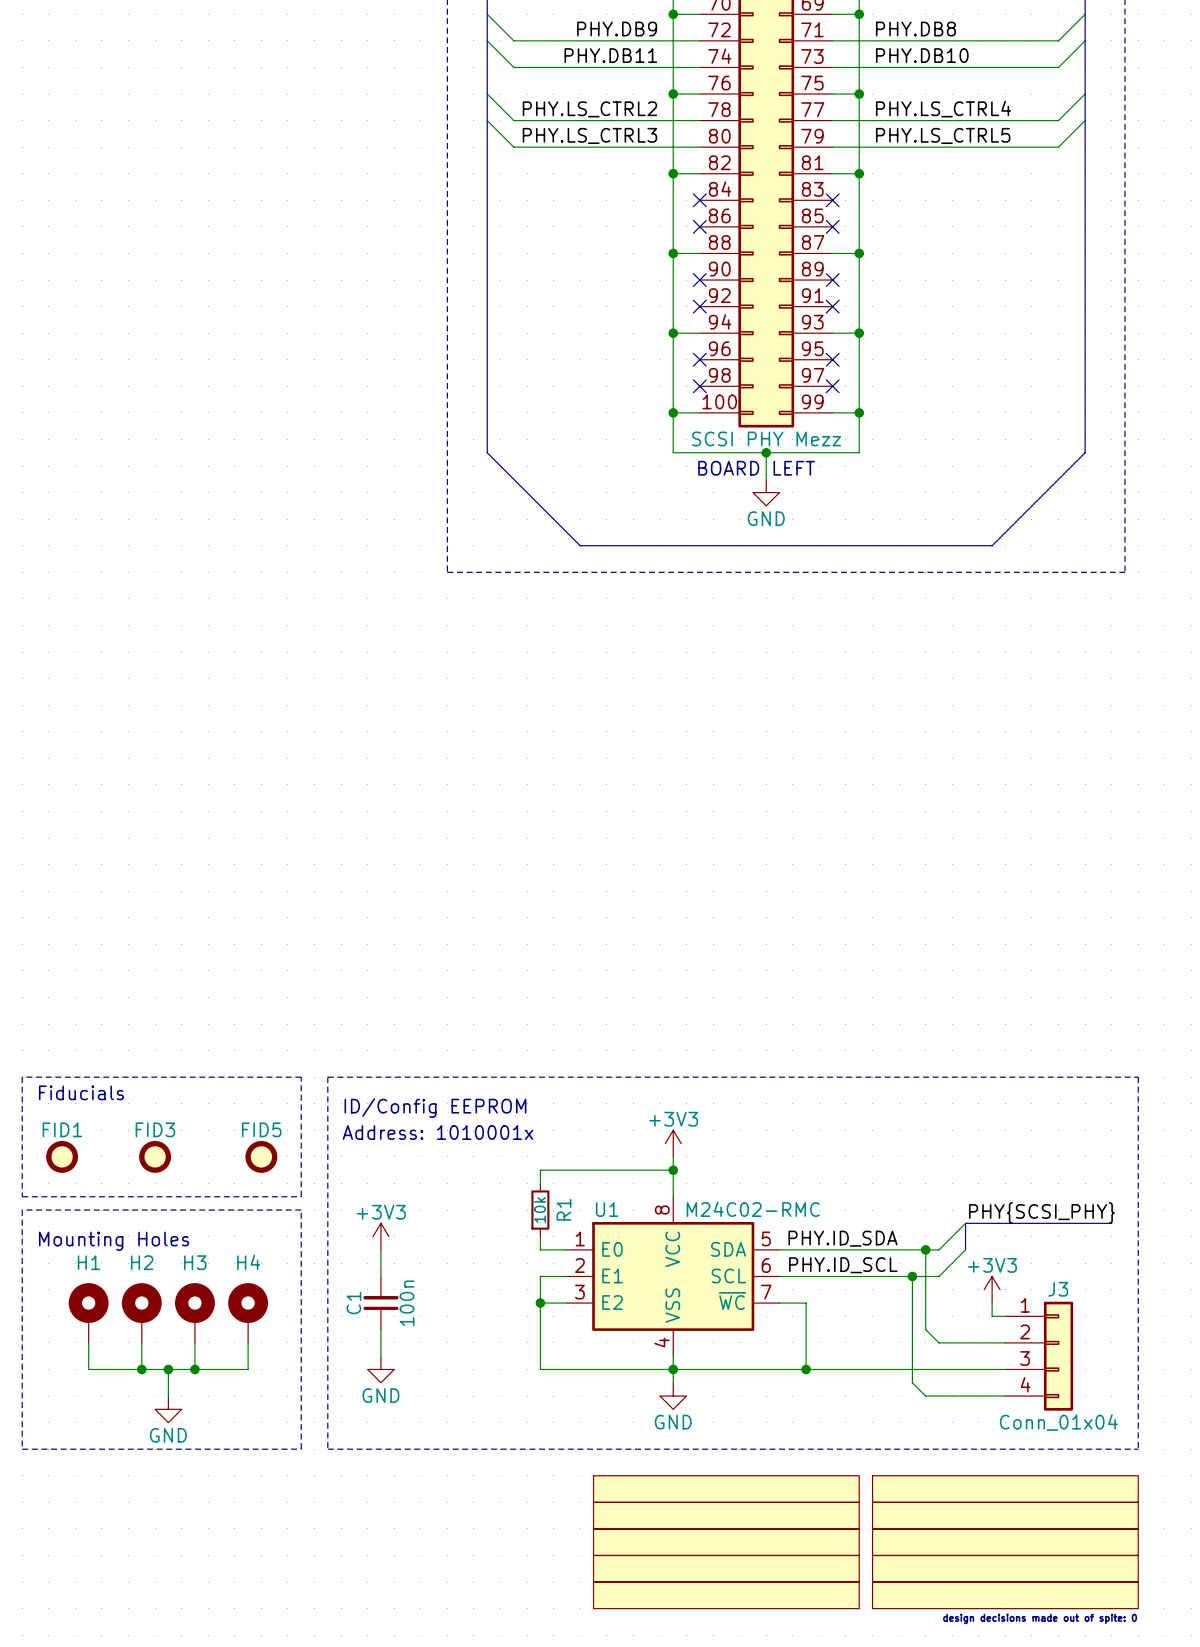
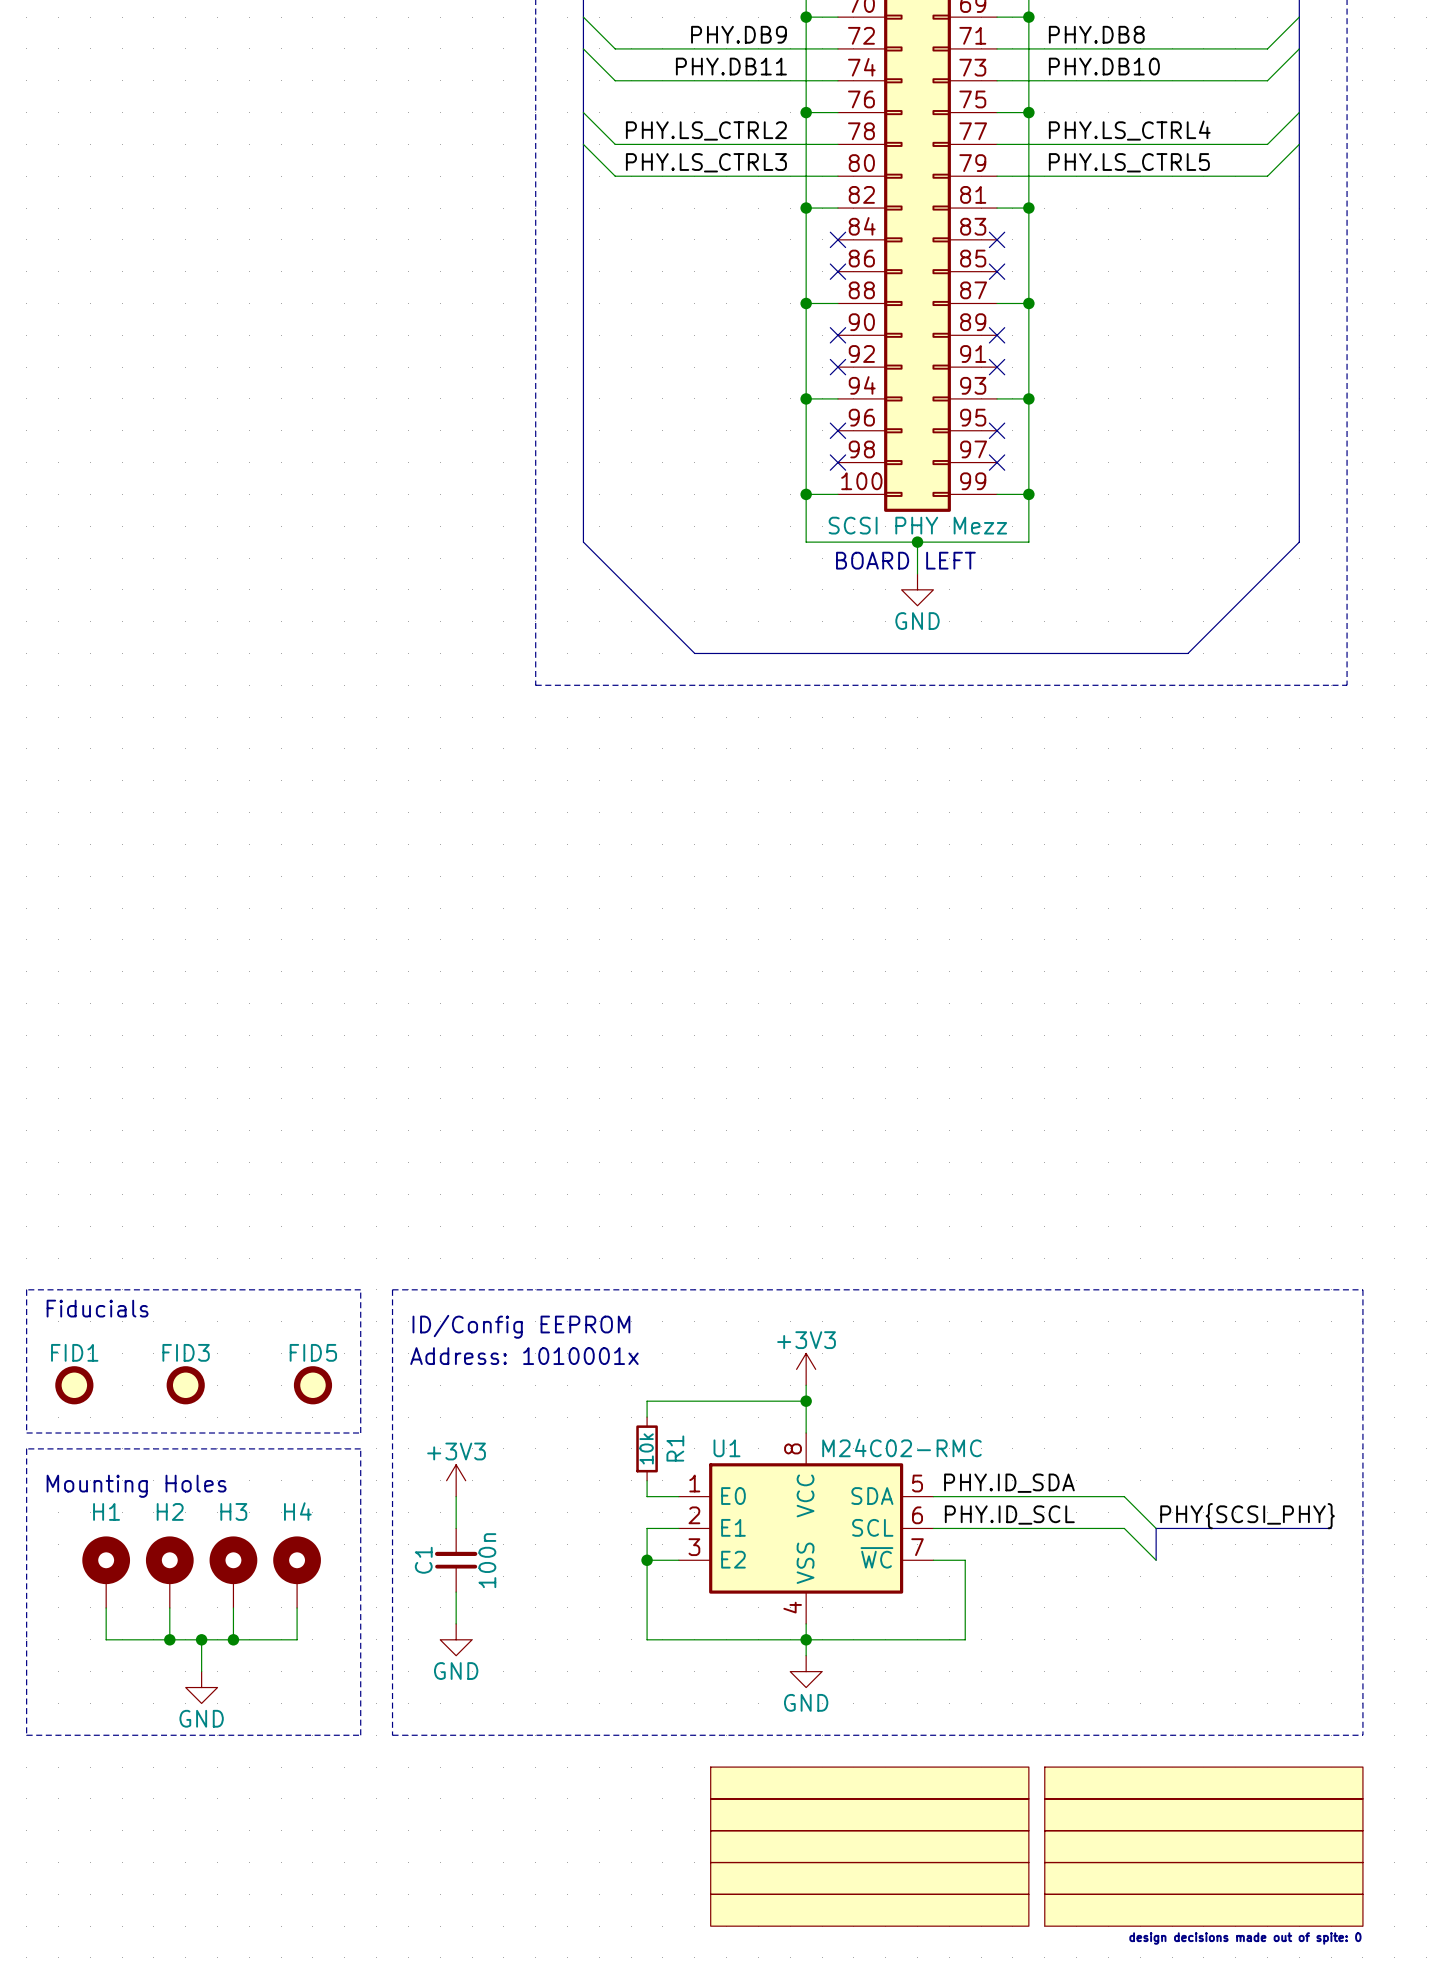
label position: PHY{SCSI_PHY} (1041, 1213) -> PHY{SCSI_PHY} (1247, 1516)
wire: (965, 1223) (938, 1249) -> (1156, 1528) (1124, 1496)
bus: (1111, 1223) (965, 1223) (965, 1249) -> (1331, 1528) (1156, 1528) (1156, 1560)
wire: (925, 1249) (925, 1329) (938, 1342) (1005, 1342) -> none
junction: (925, 1249) -> none
wire: (965, 1249) (938, 1276) -> (1156, 1560) (1124, 1528)
wire: (912, 1276) (912, 1382) (925, 1396) (1005, 1396) -> none
junction: (912, 1276) -> none
power symbol: +3V3 (992, 1289) -> none
wire: (992, 1303) (992, 1316) (1005, 1316) -> none
J3: Conn_01x04 (1039, 1356) -> none
wire: (806, 1369) (1005, 1369) -> none
junction: (806, 1369) -> none

